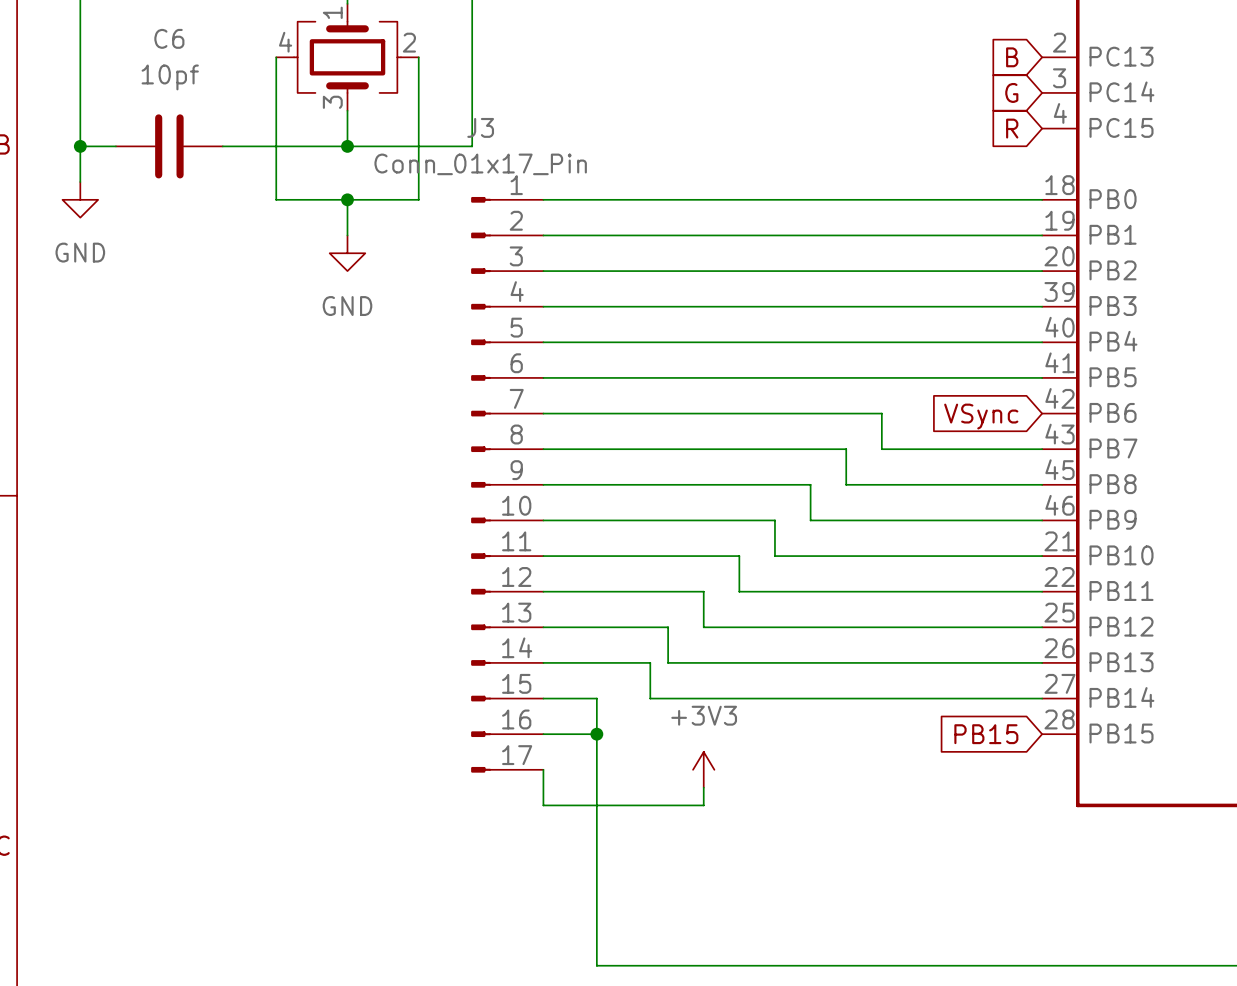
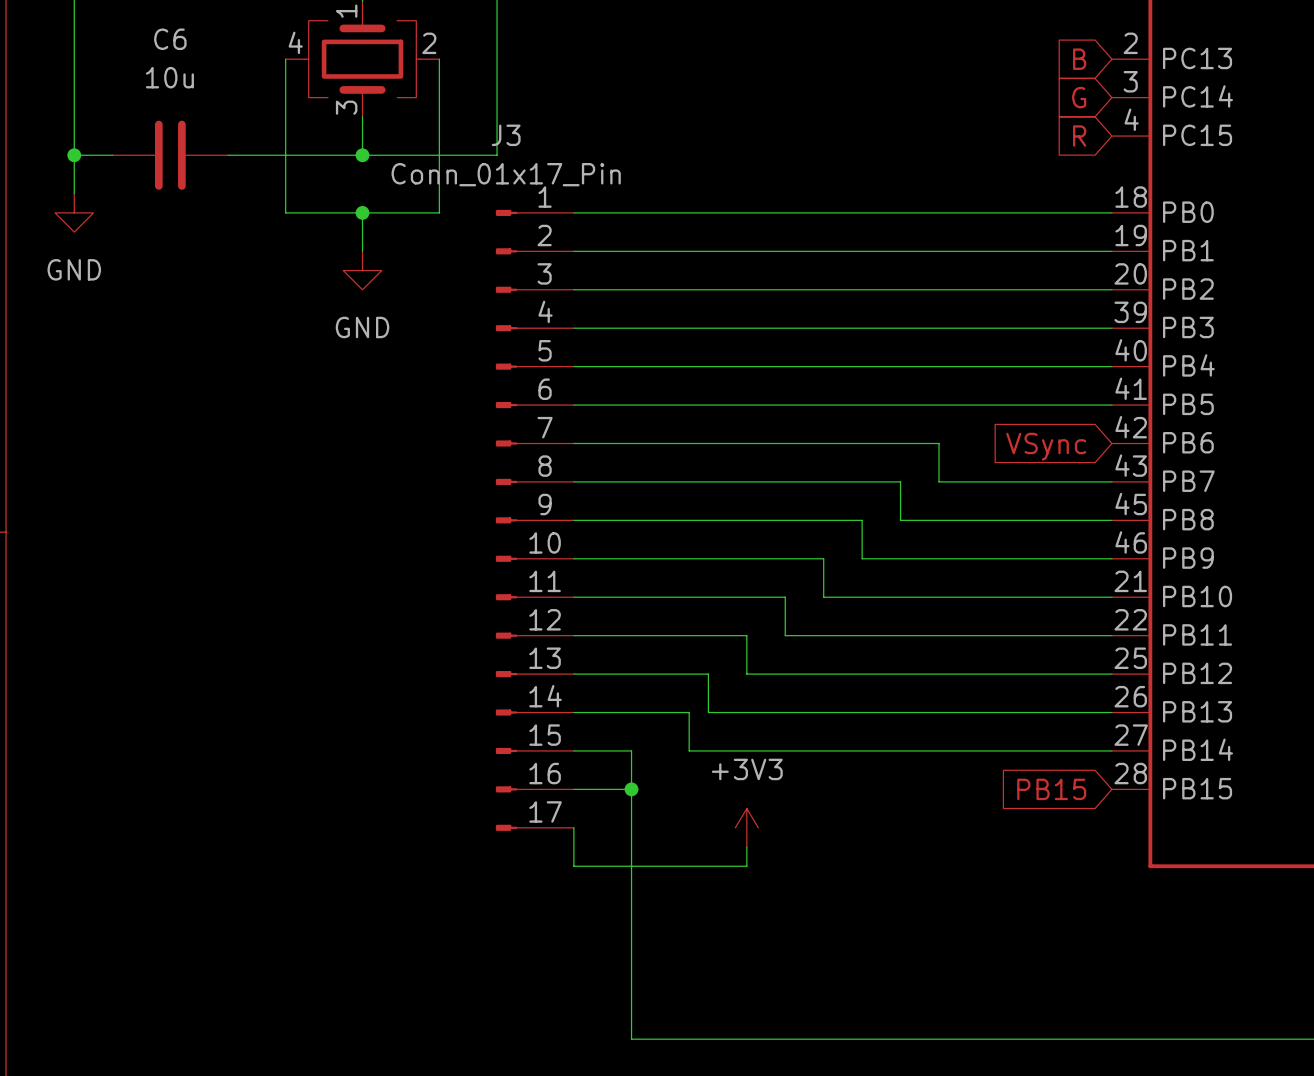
C6 value: 10pf (170, 77) -> 10u (169, 77)

